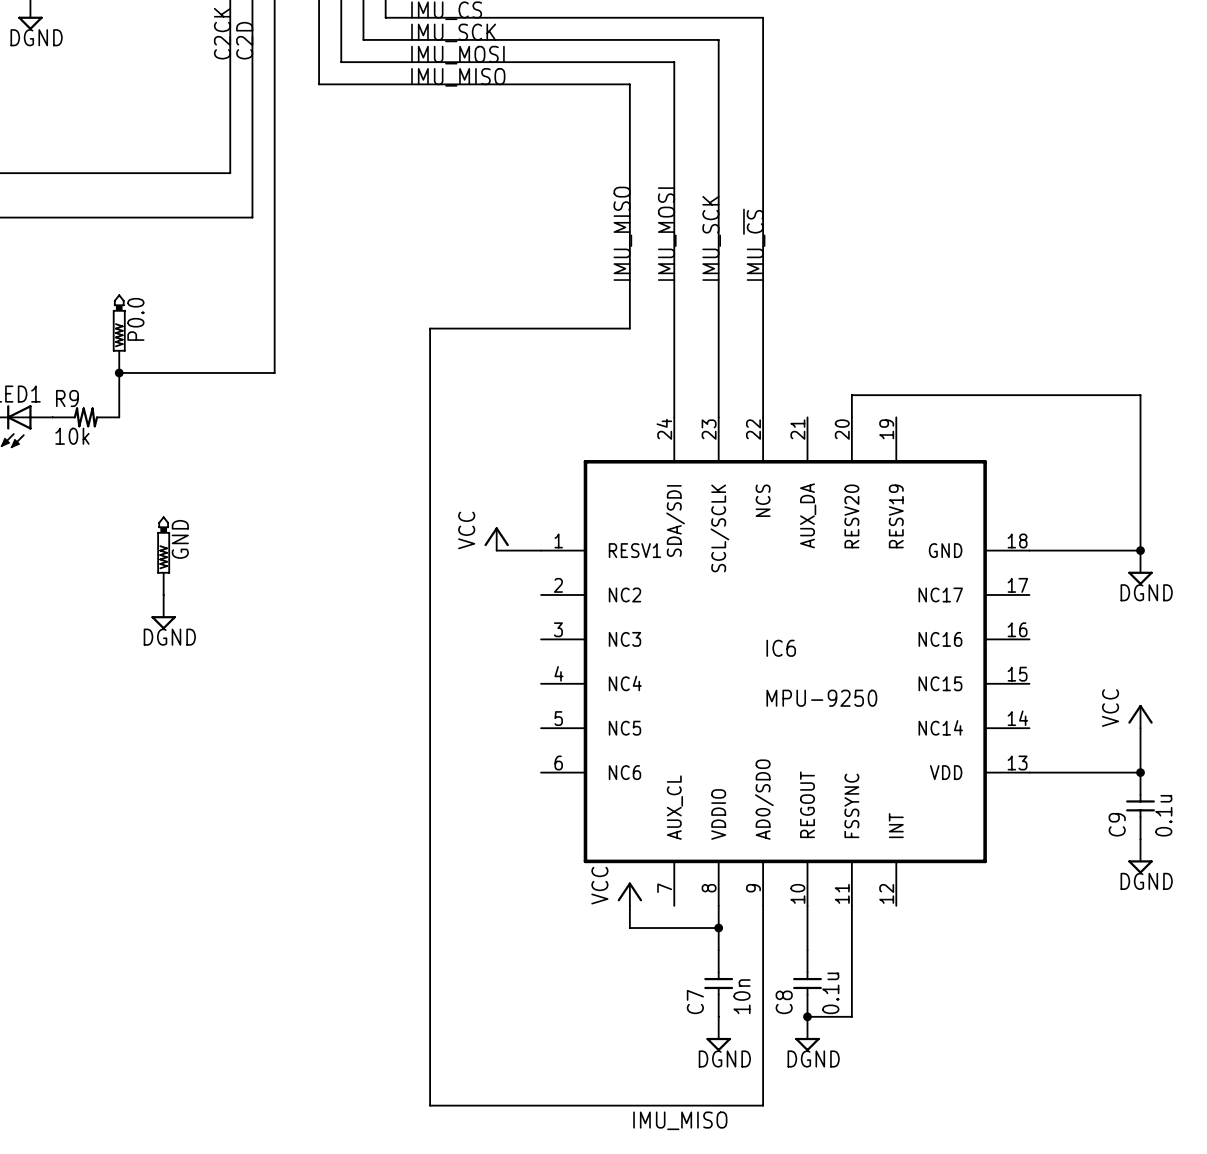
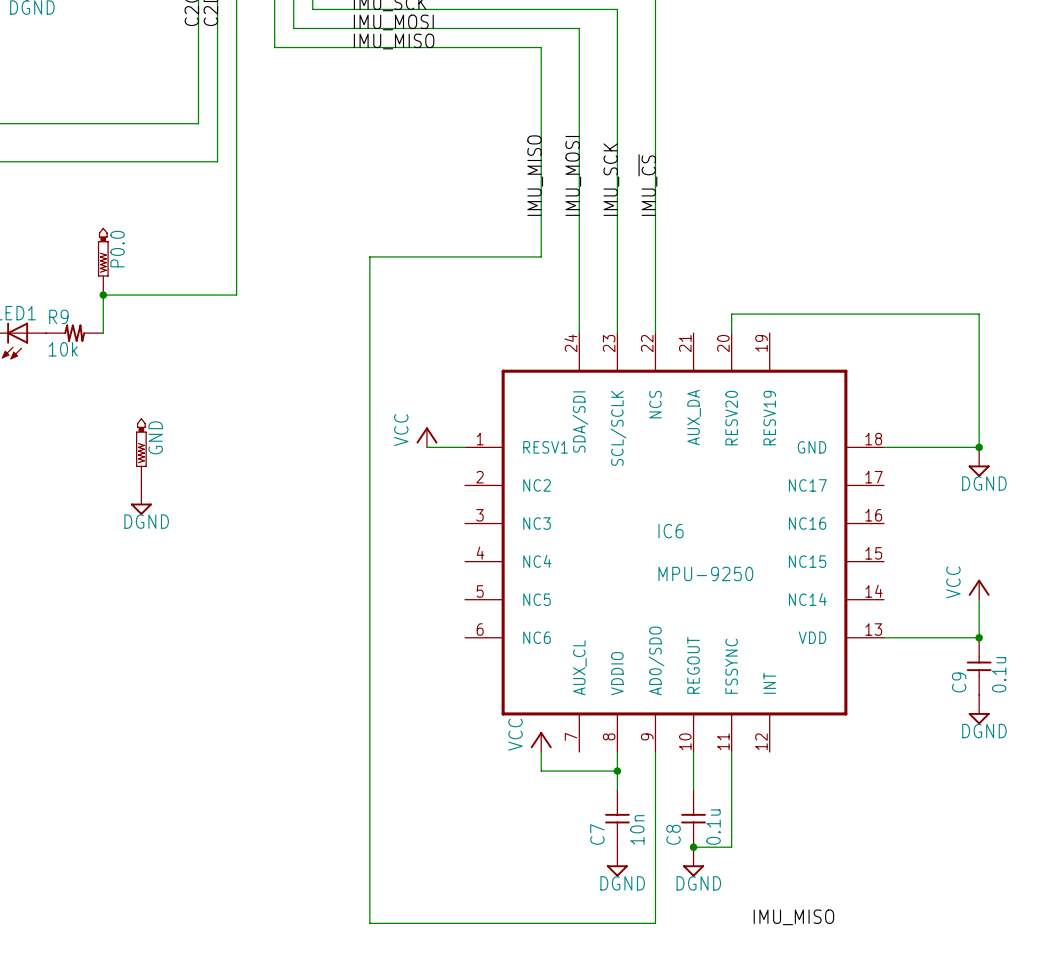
label: none -> IMU_MISO (793, 917)
label: IMU_MISO (680, 1120) -> none

